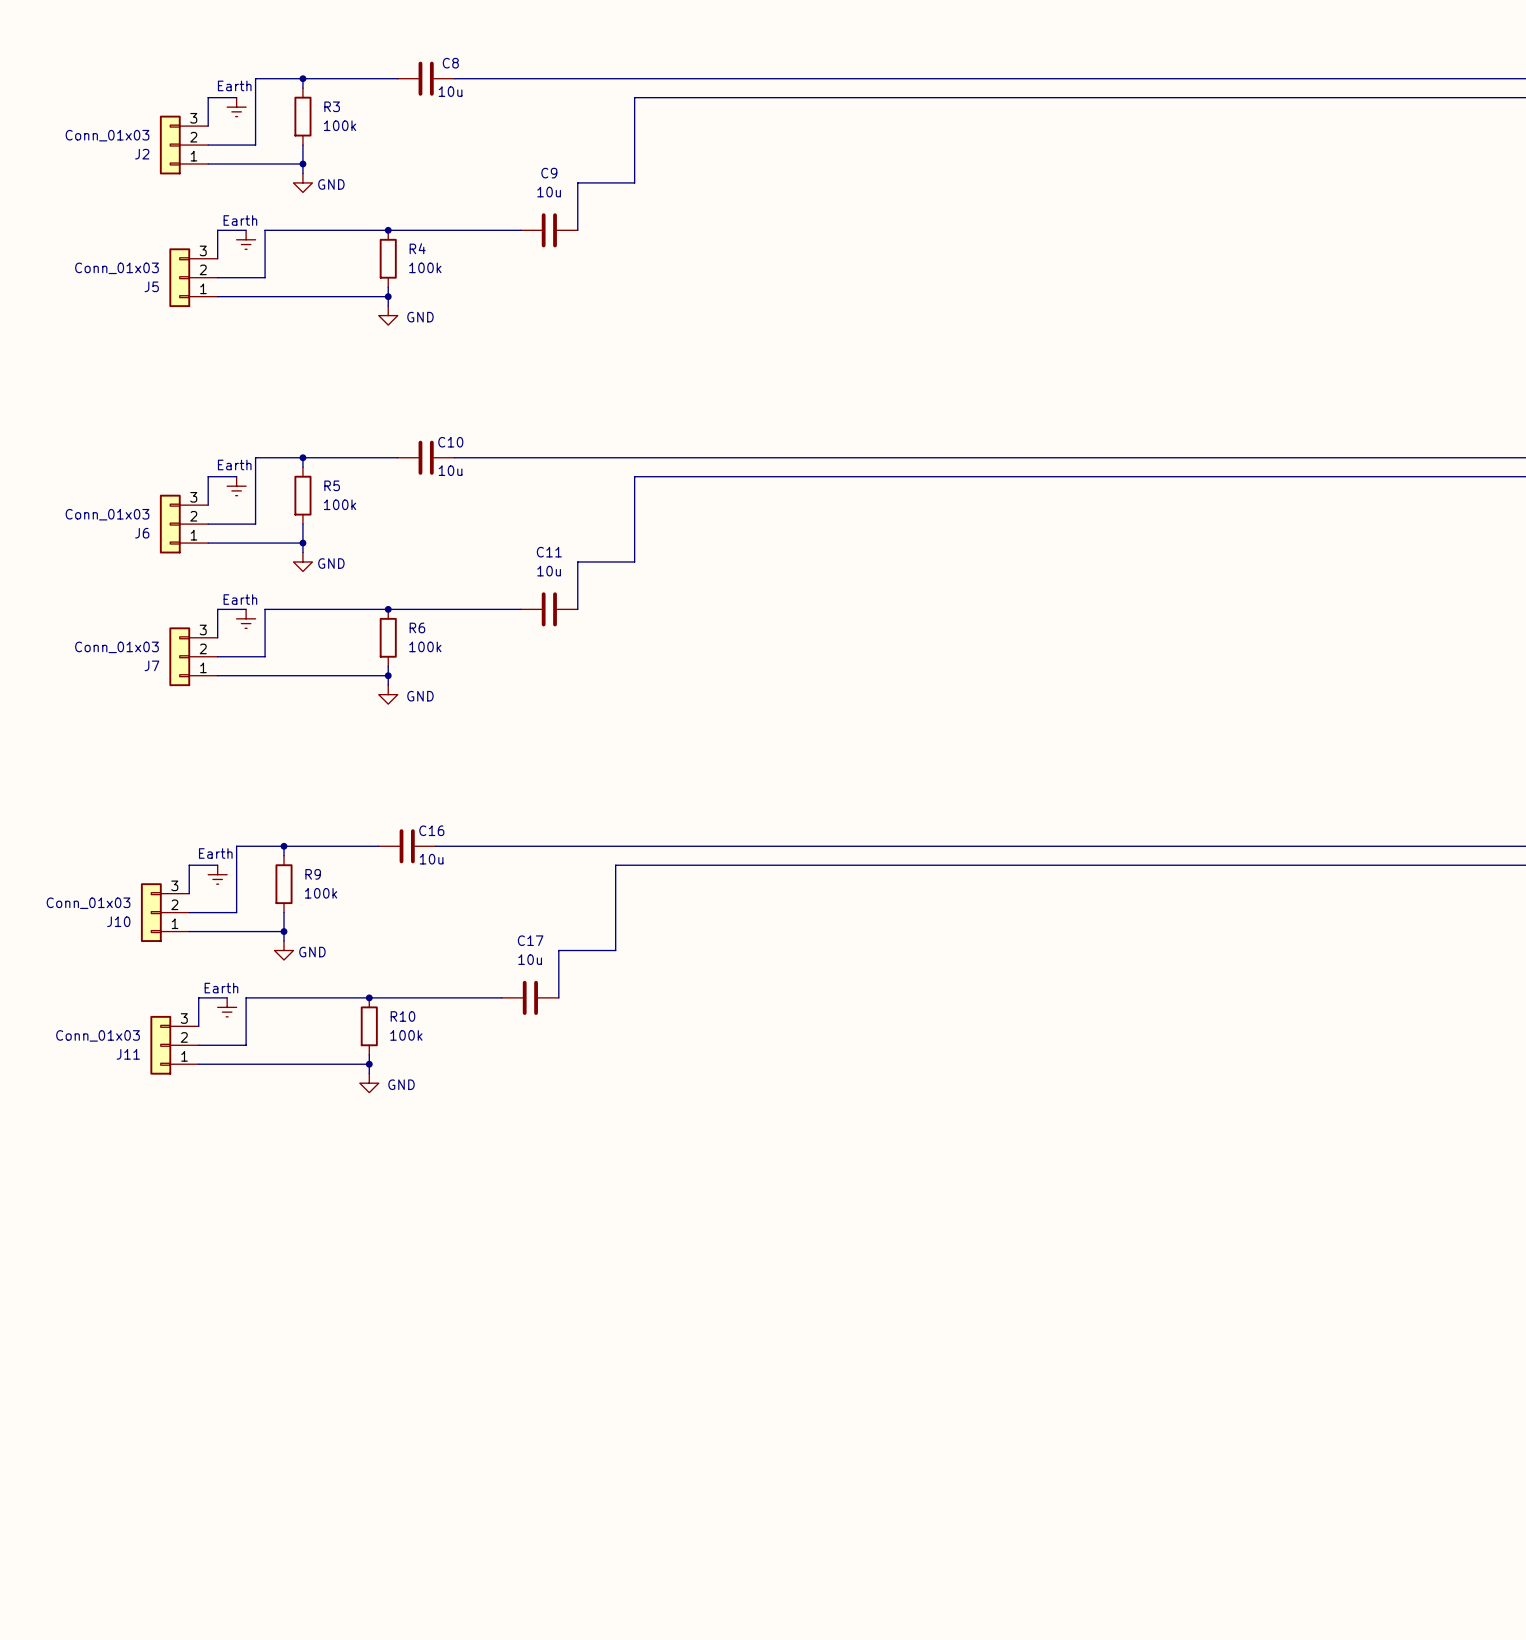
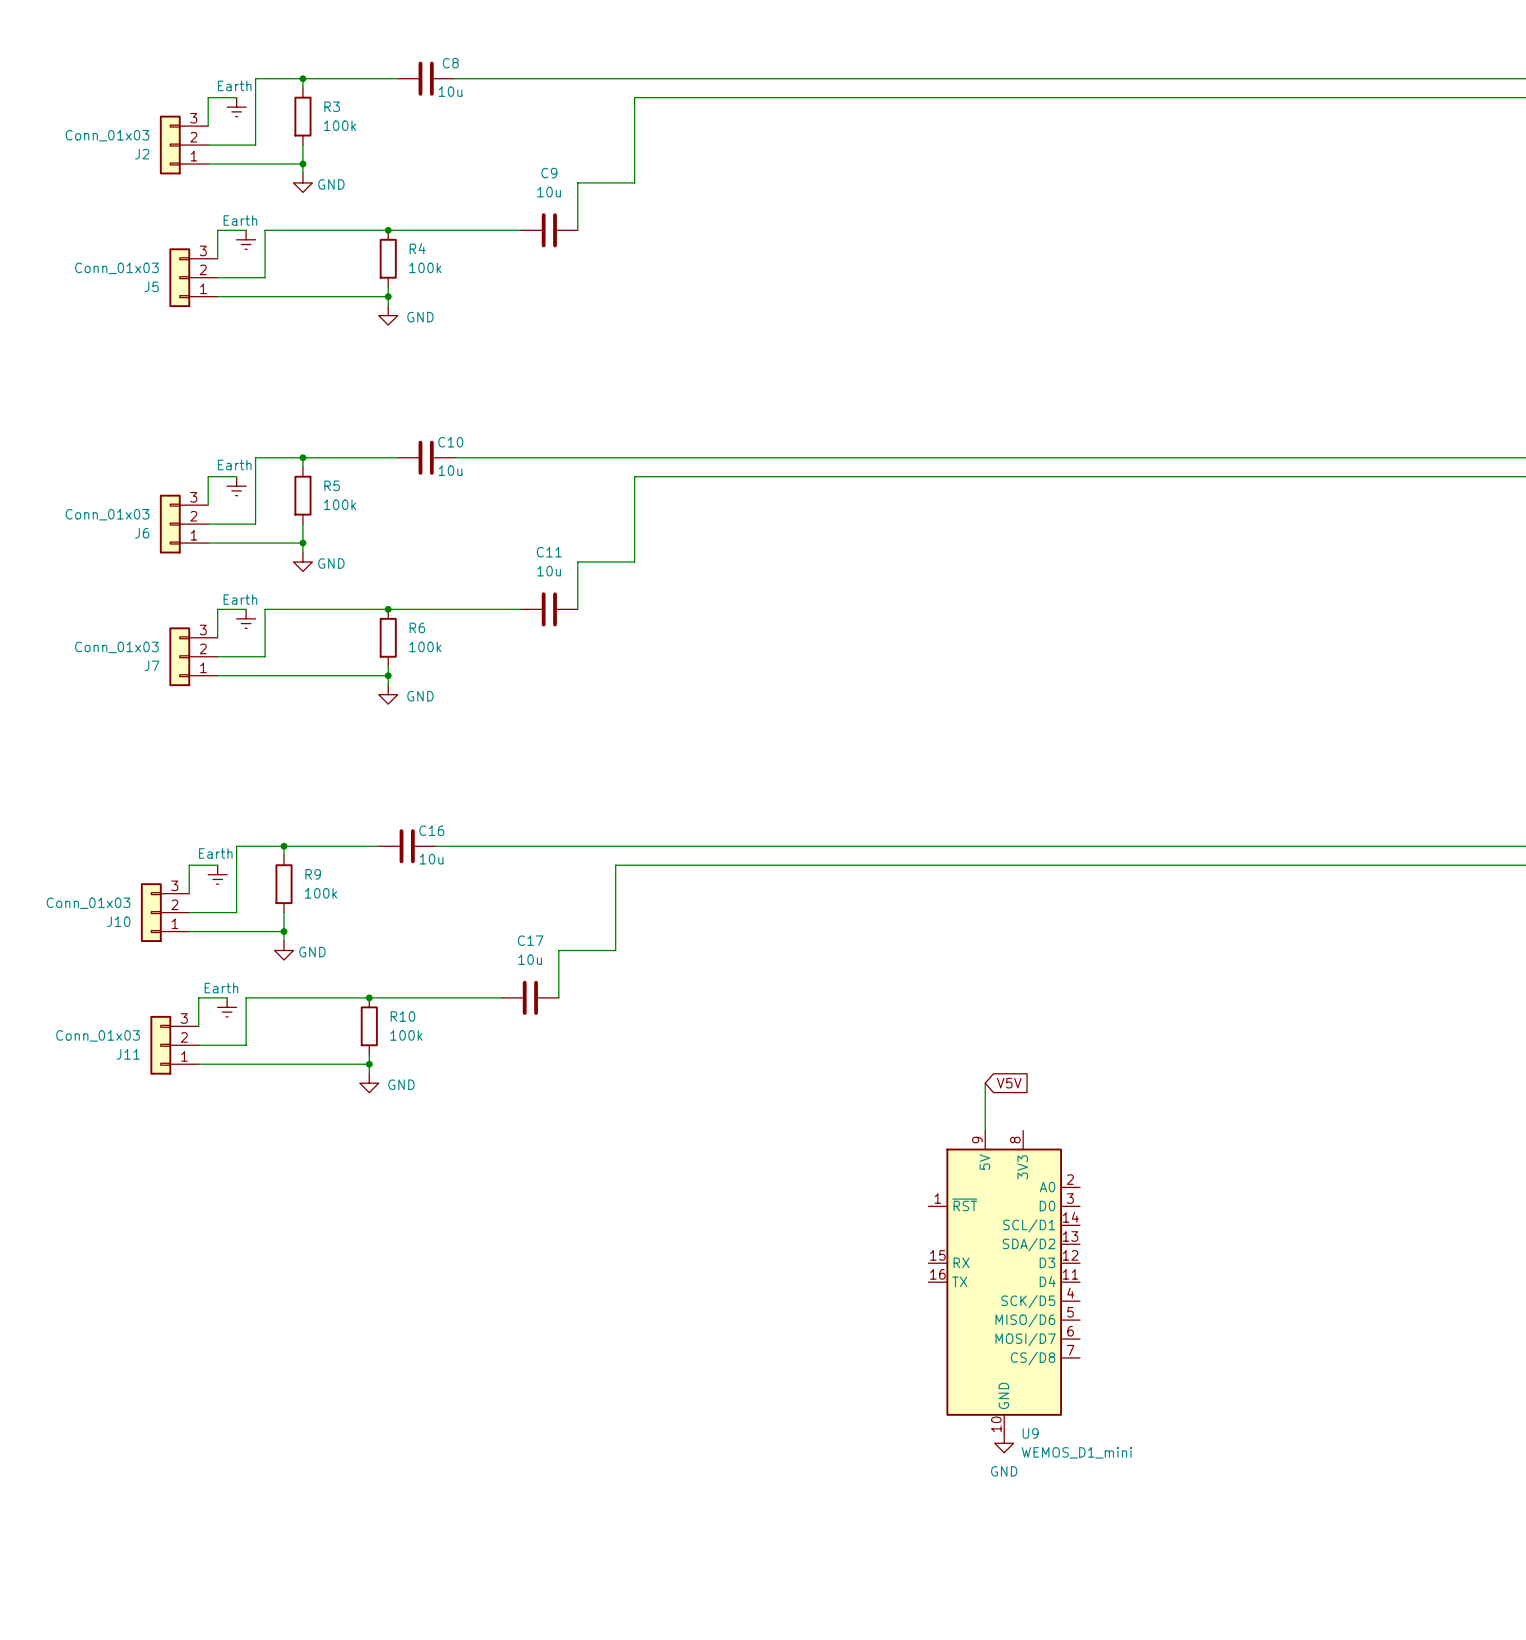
wire: none -> (985, 1083) (985, 1130)
global label: none -> V5V (1009, 1083)
U9: none -> WEMOS_D1_mini (1004, 1282)
power symbol: none -> GND (1004, 1443)

